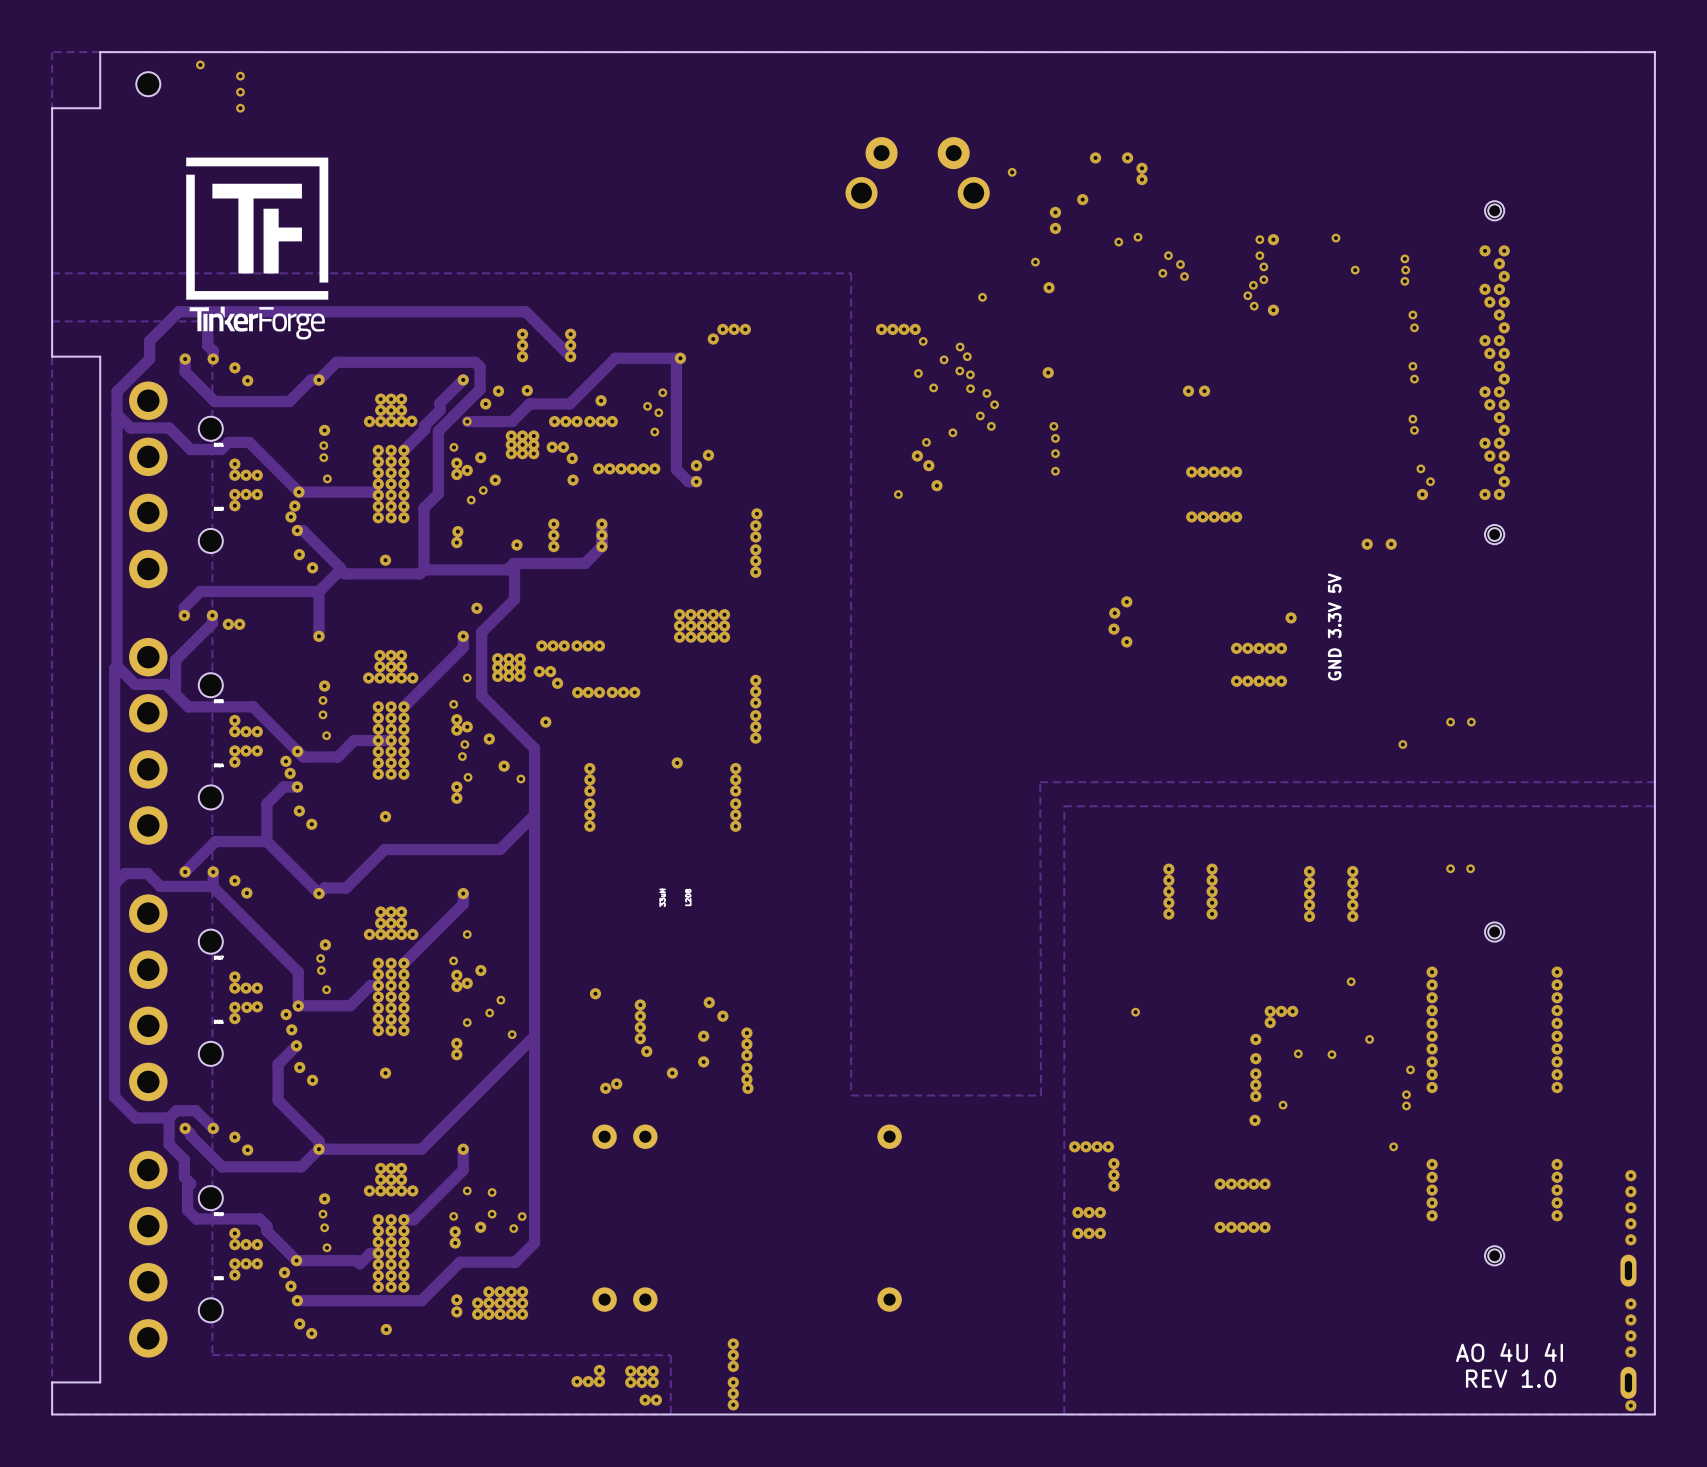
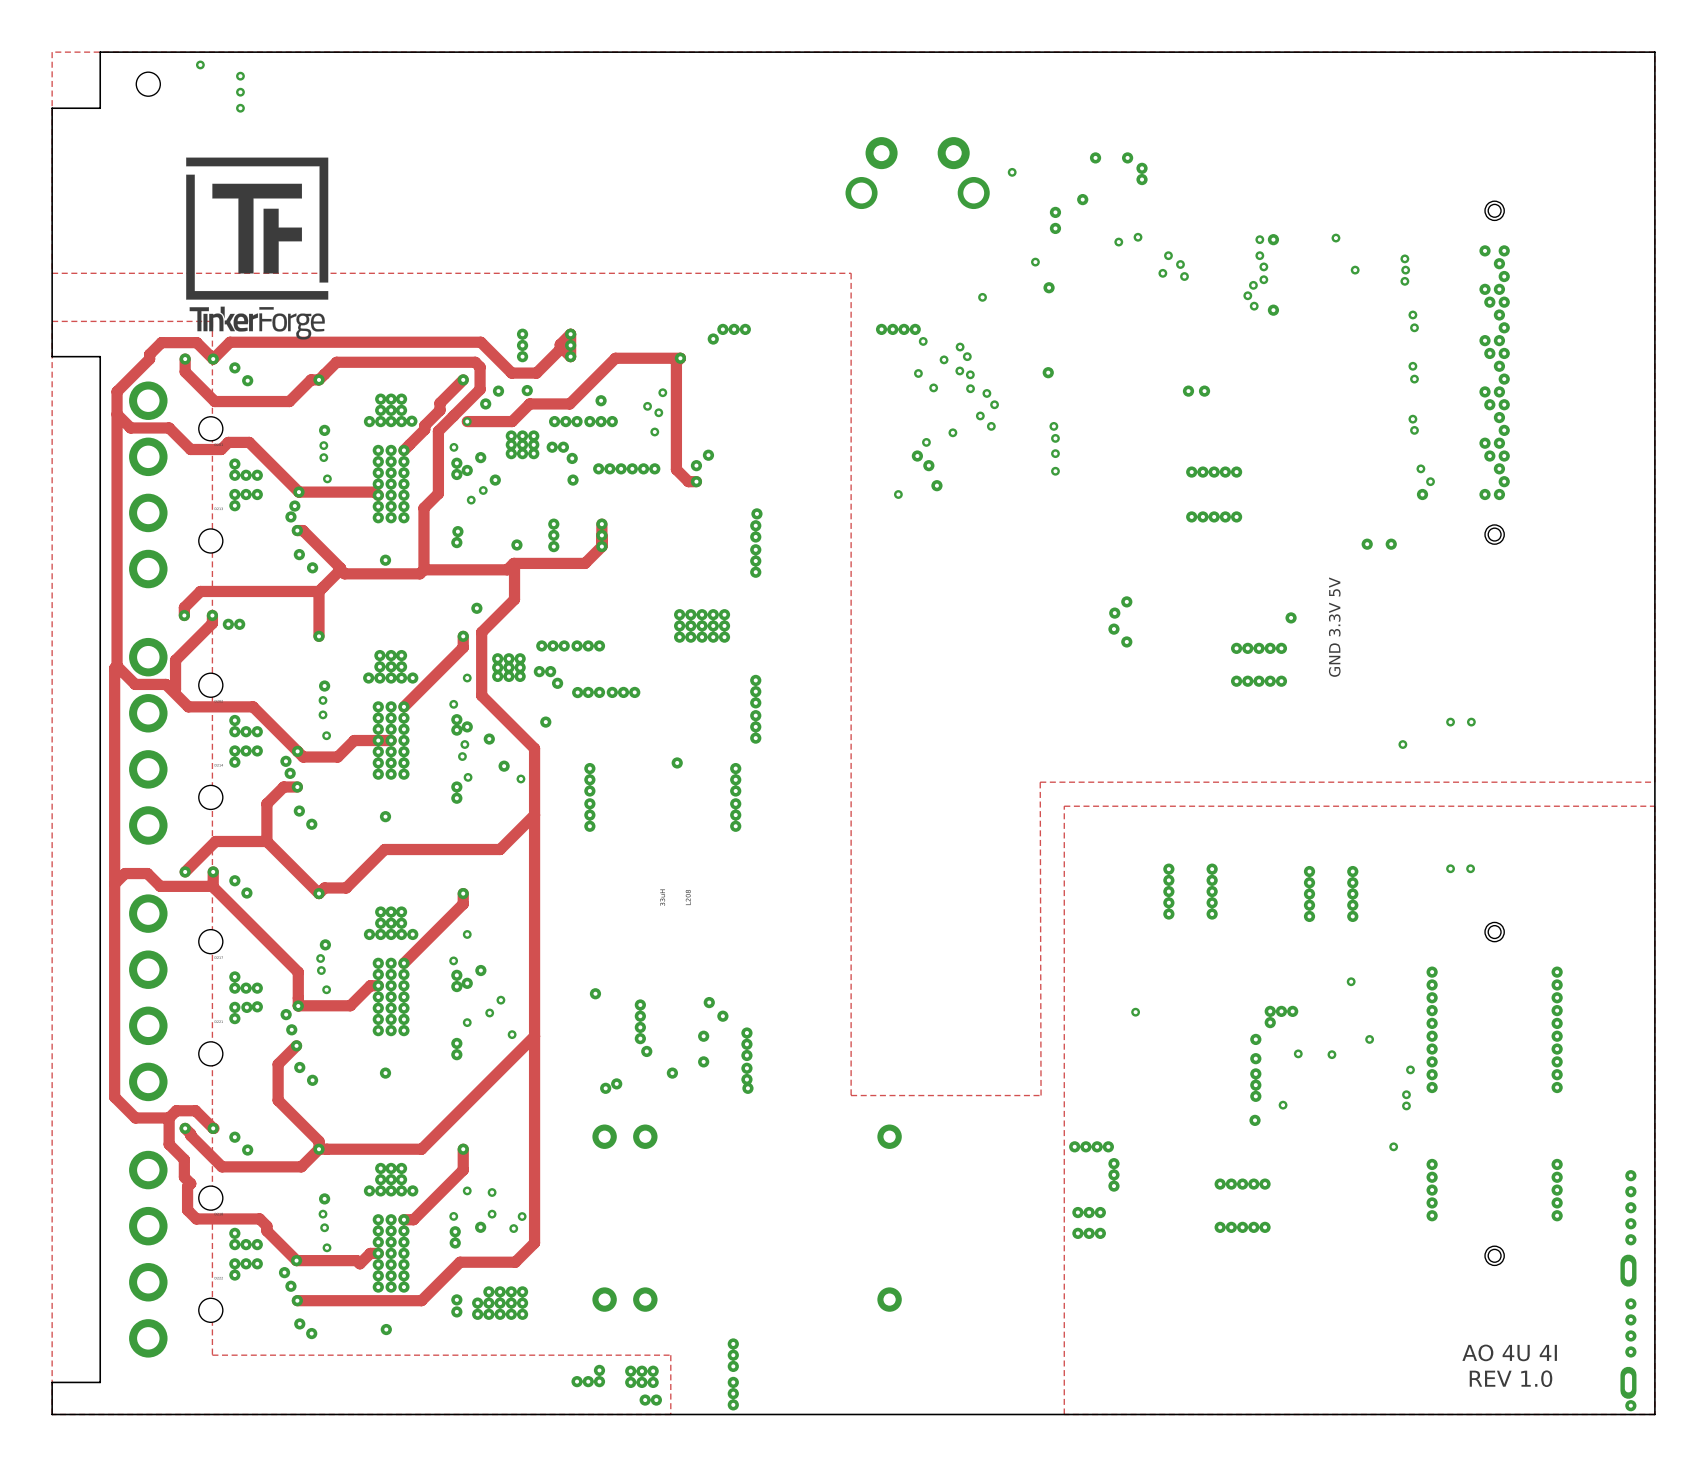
track: (207, 311) (207, 345) (213, 351) (213, 359) -> none
track: (565, 351) (525, 311) (178, 311) (149, 340) (149, 354) -> (570, 356) (570, 334) (560, 344) (560, 349) (536, 373) (511, 373) (480, 342) (230, 342) (213, 359) (196, 342) (161, 342) (149, 354)

